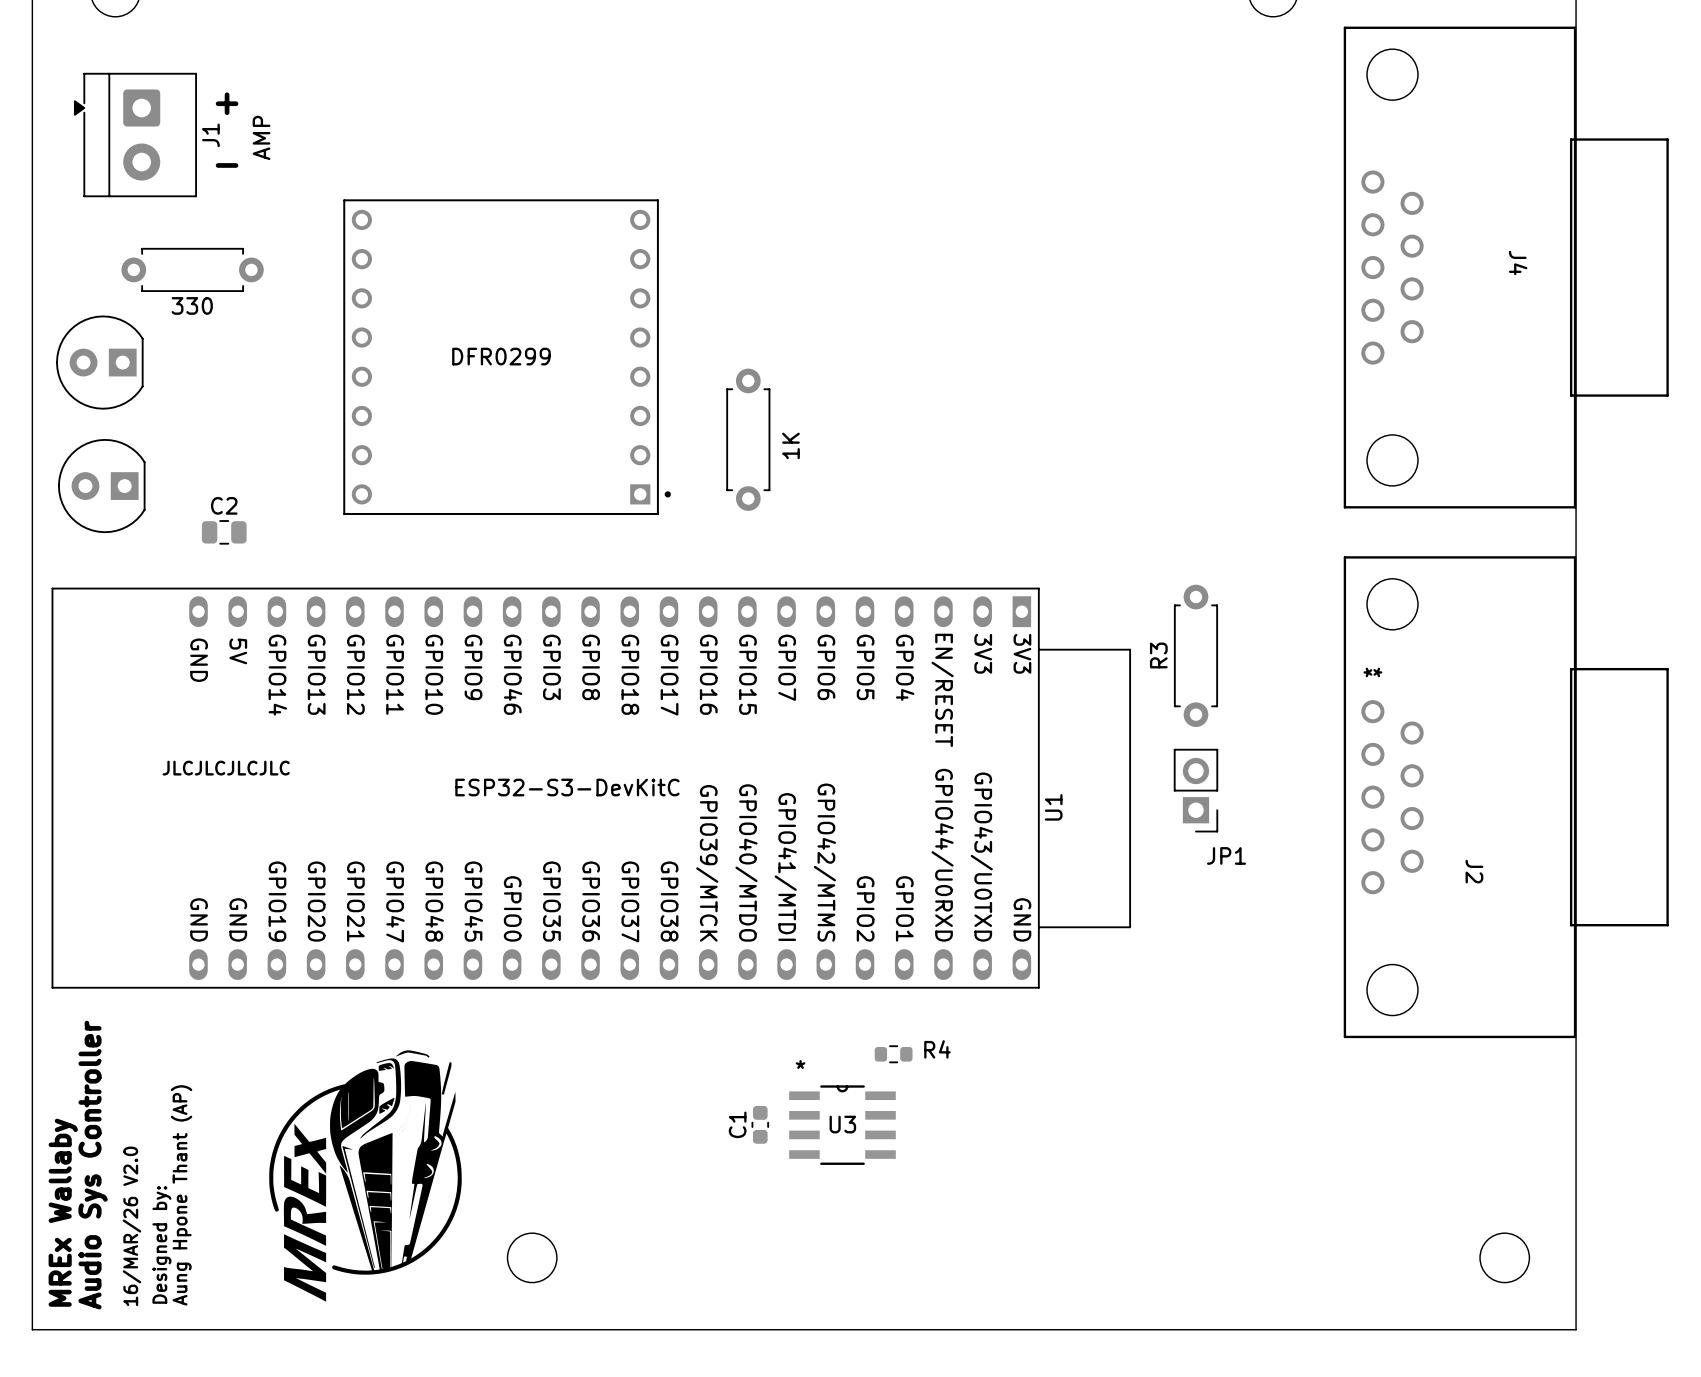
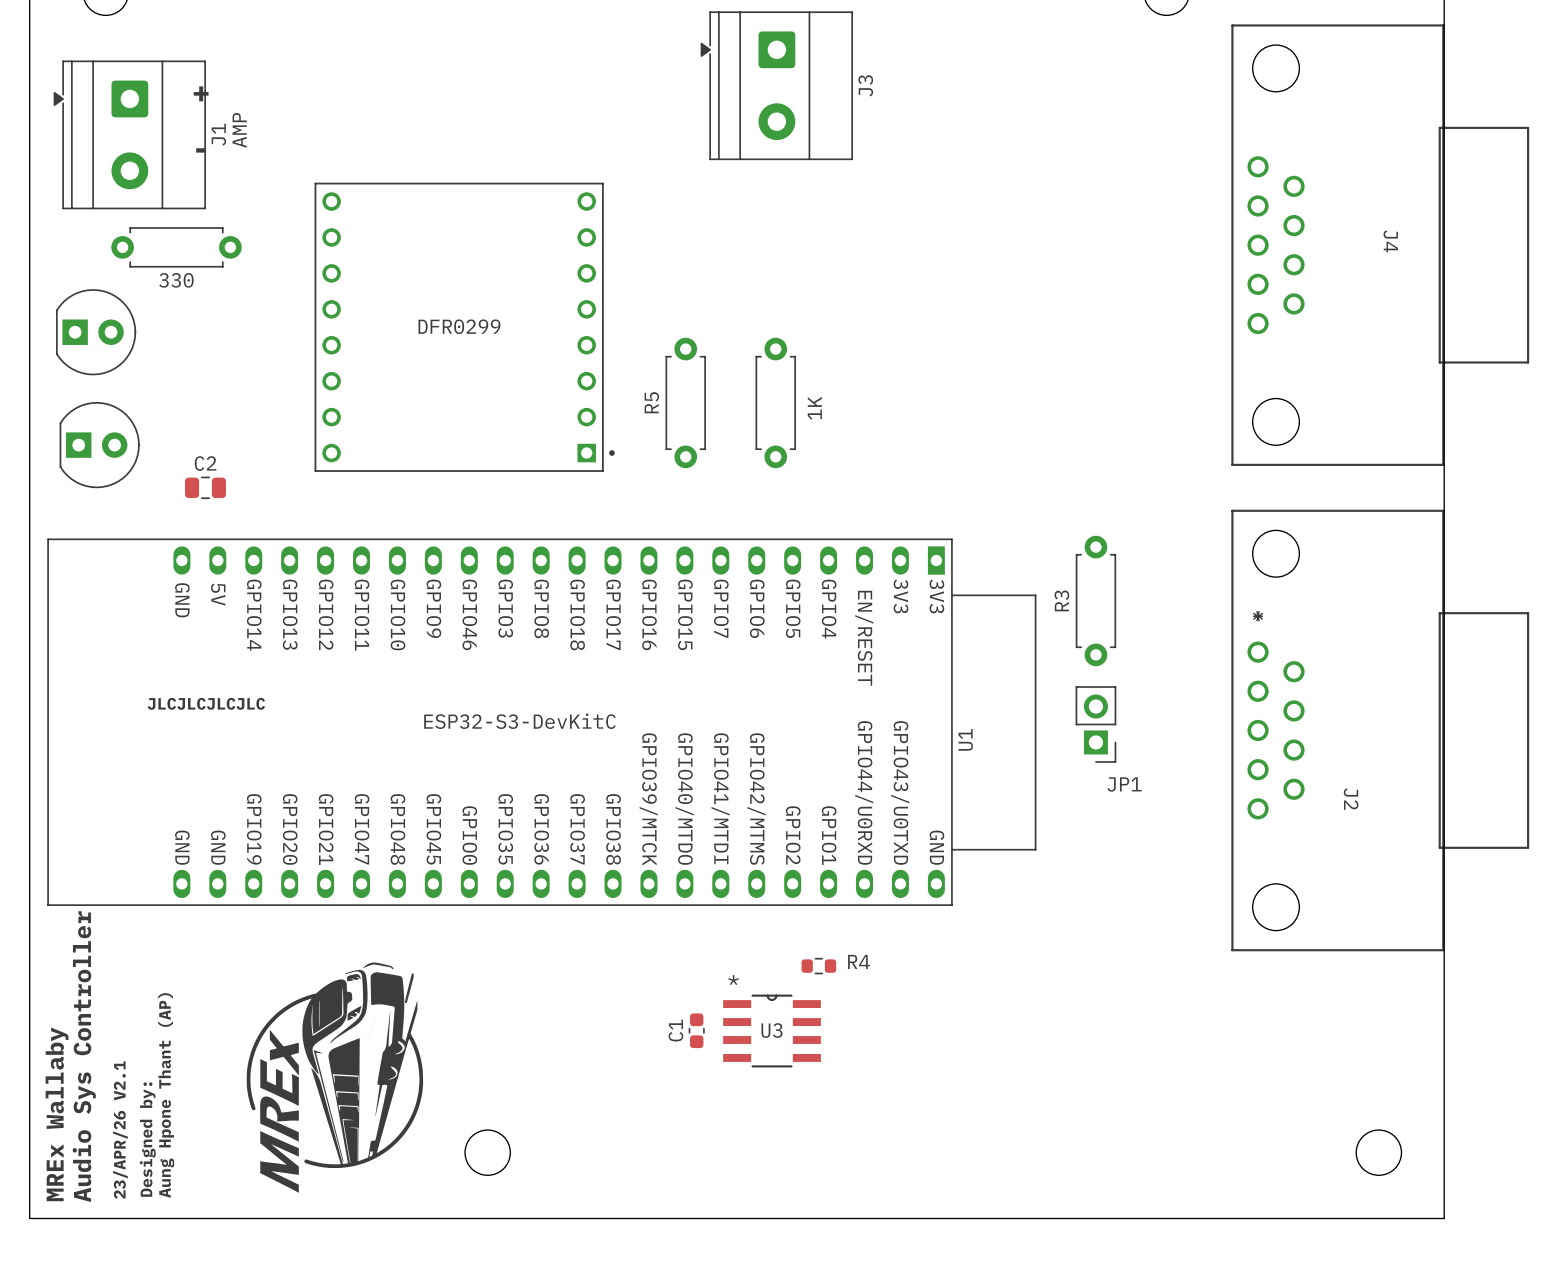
J1 footprint: [73, 72, 197, 198] -> [53, 60, 206, 210]
J3: none -> (776, 85)
part rotation: 0° (99, 362) -> 180° (96, 332)
R5 name: none -> R5 (651, 402)
part: none -> 1K (775, 402)
R5 value: 1K (790, 445) -> none
part rotation: 0° (101, 486) -> 180° (99, 445)
text: 16/MAR/26 V2.0 (131, 1226) -> 23/APR/26 V2.1 (120, 1130)

